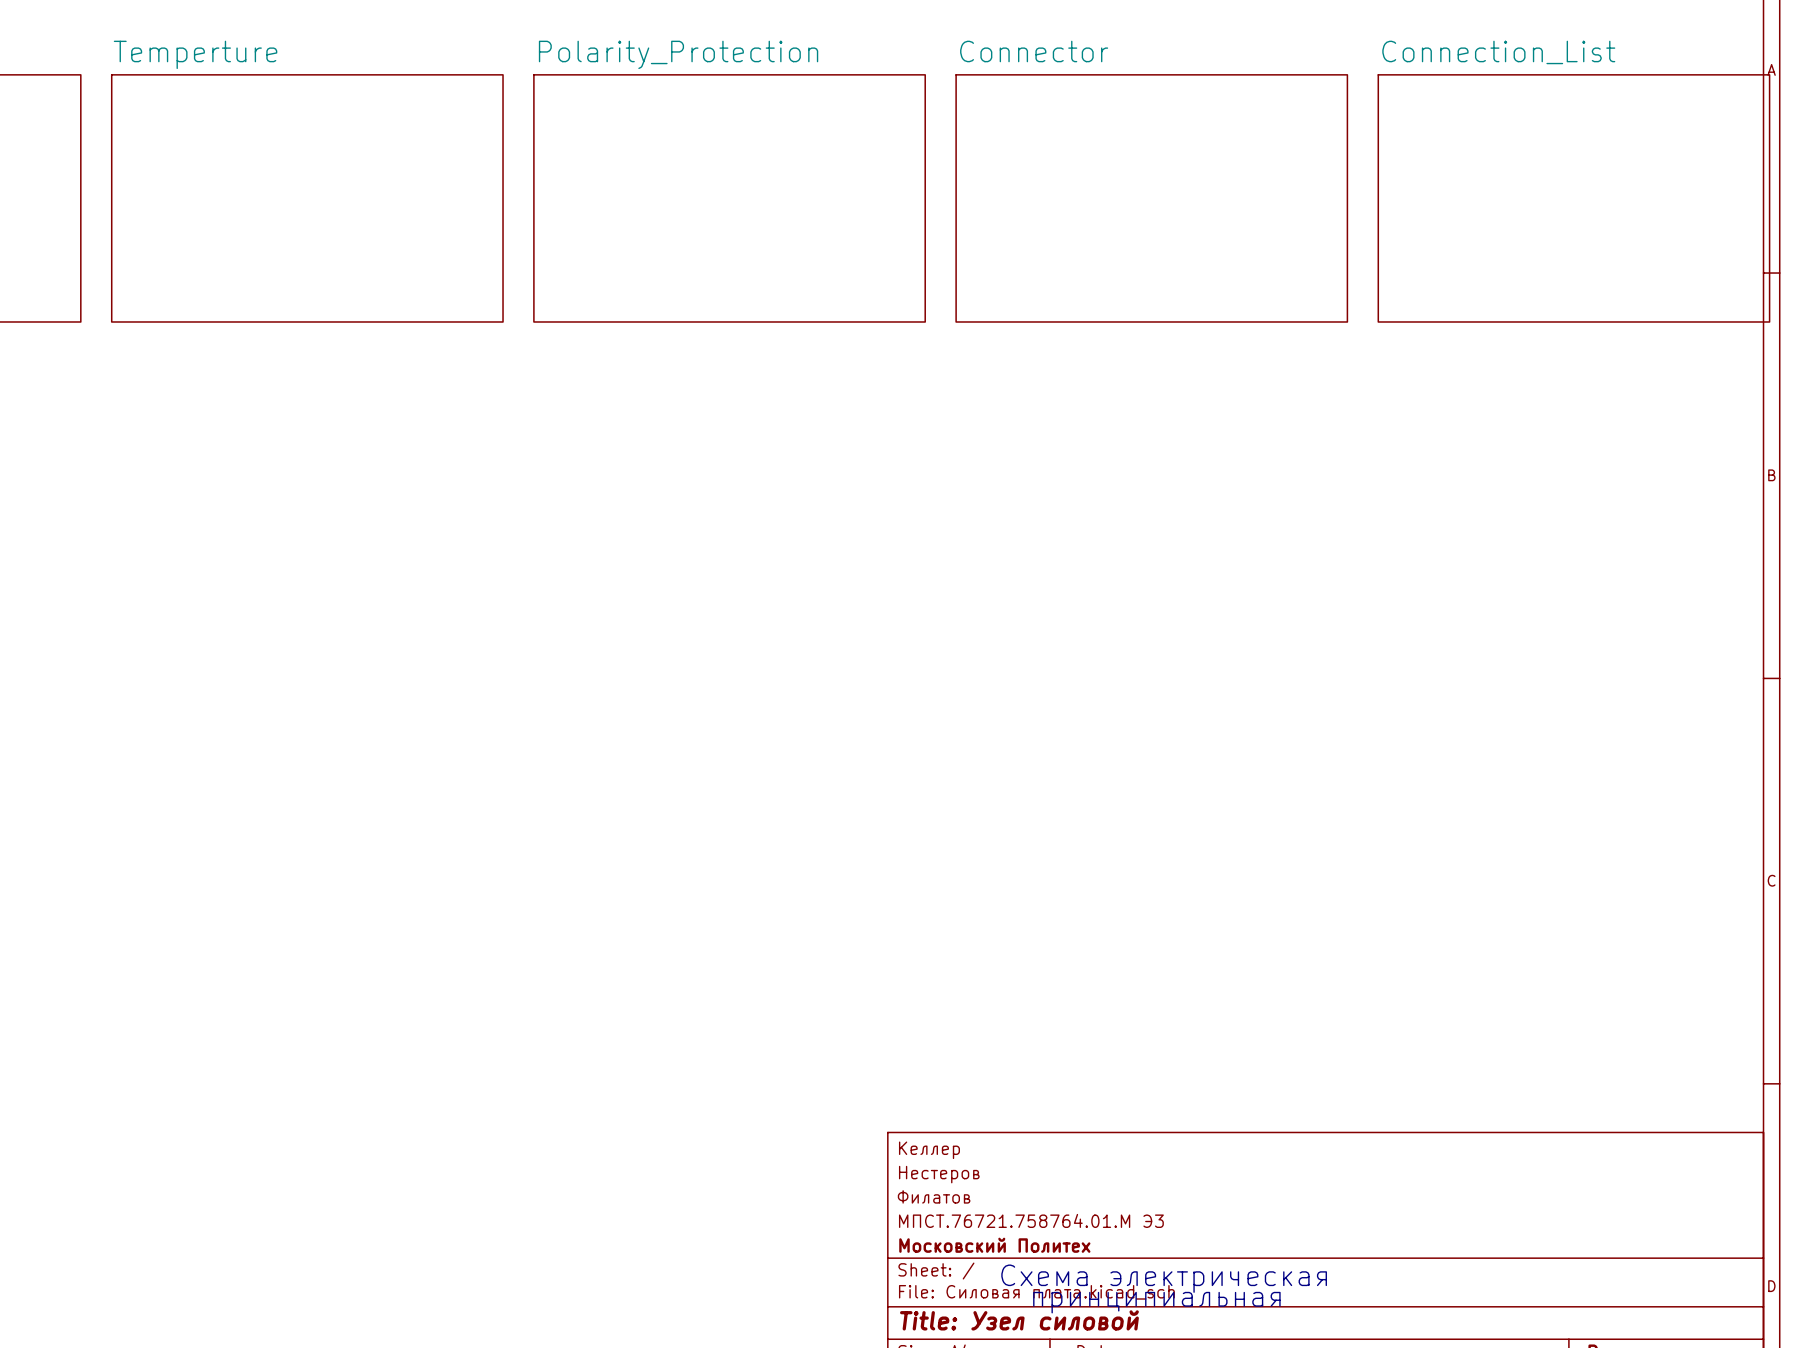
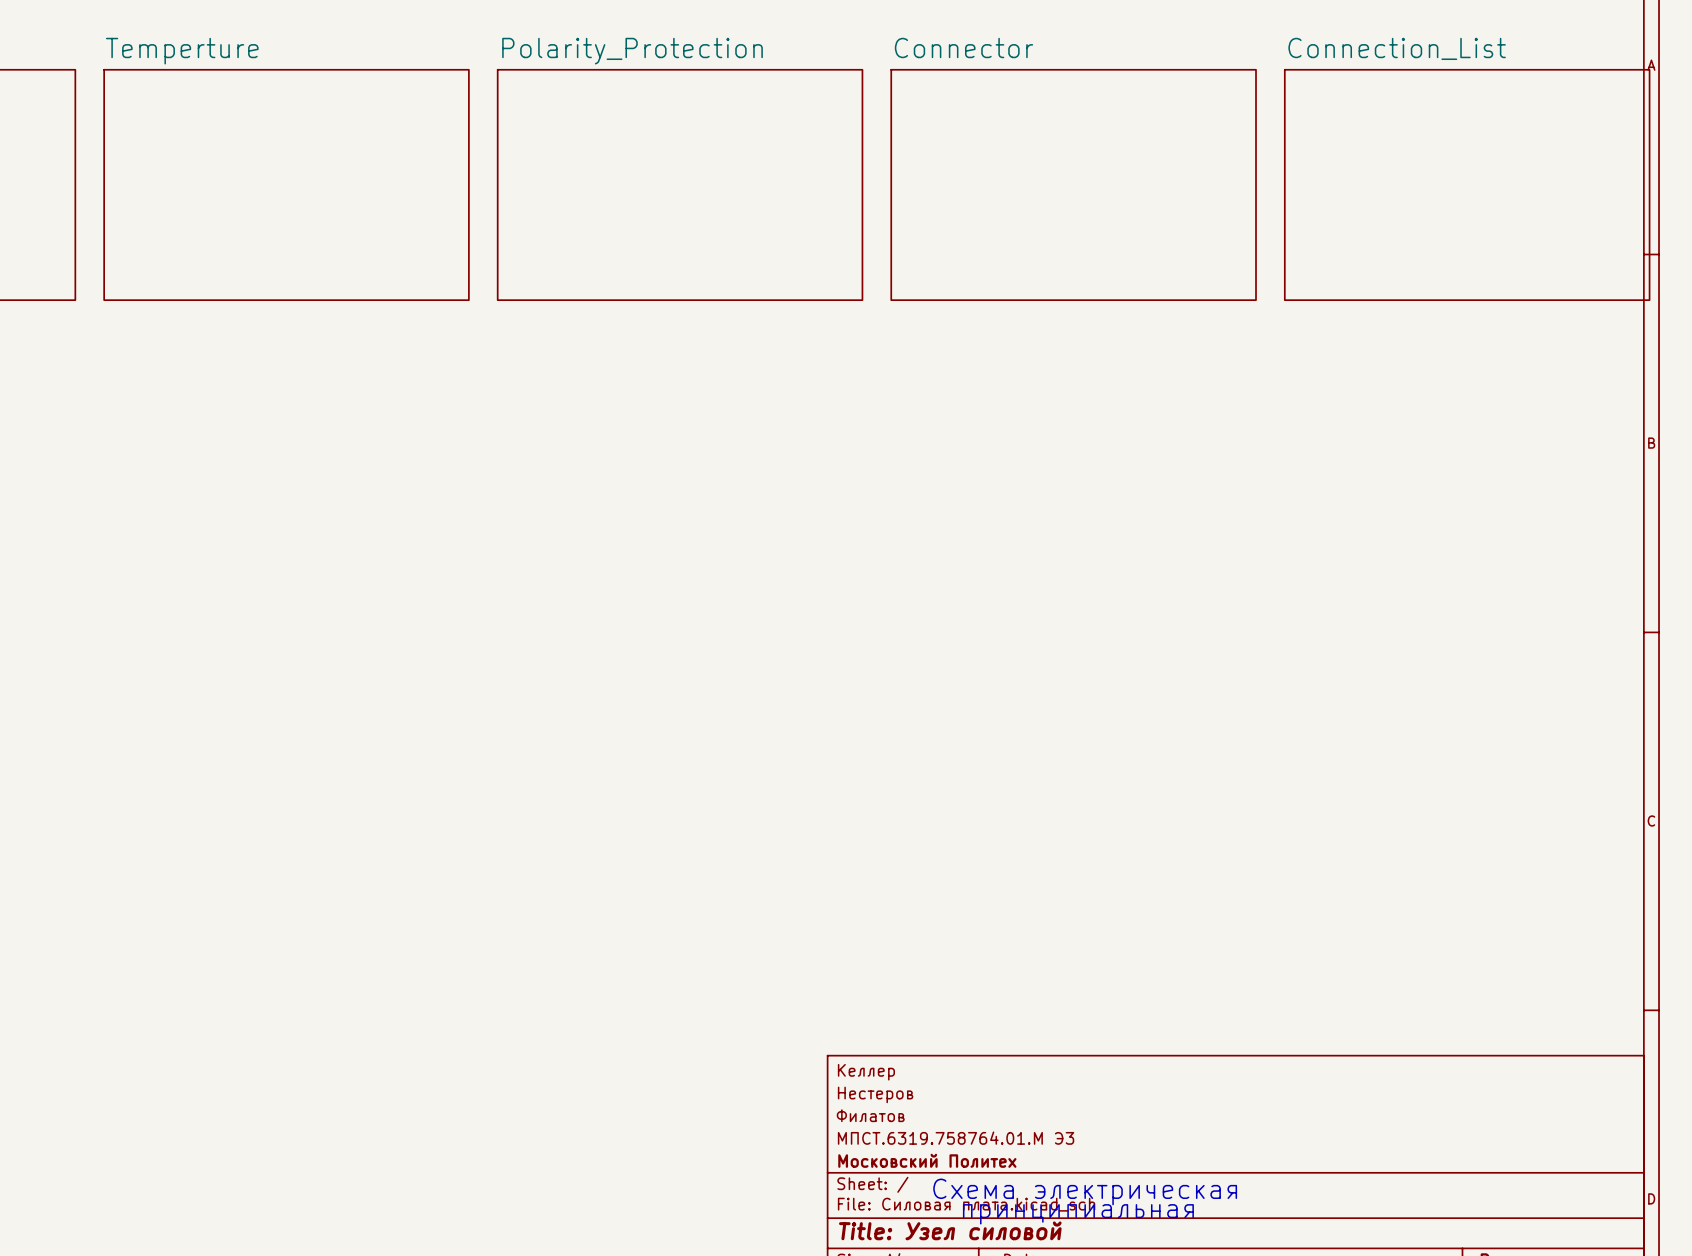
title block: МПСТ.76721.758764.01.М Э3 (1031, 1220) -> МПСТ.6319.758764.01.М Э3 (956, 1138)

